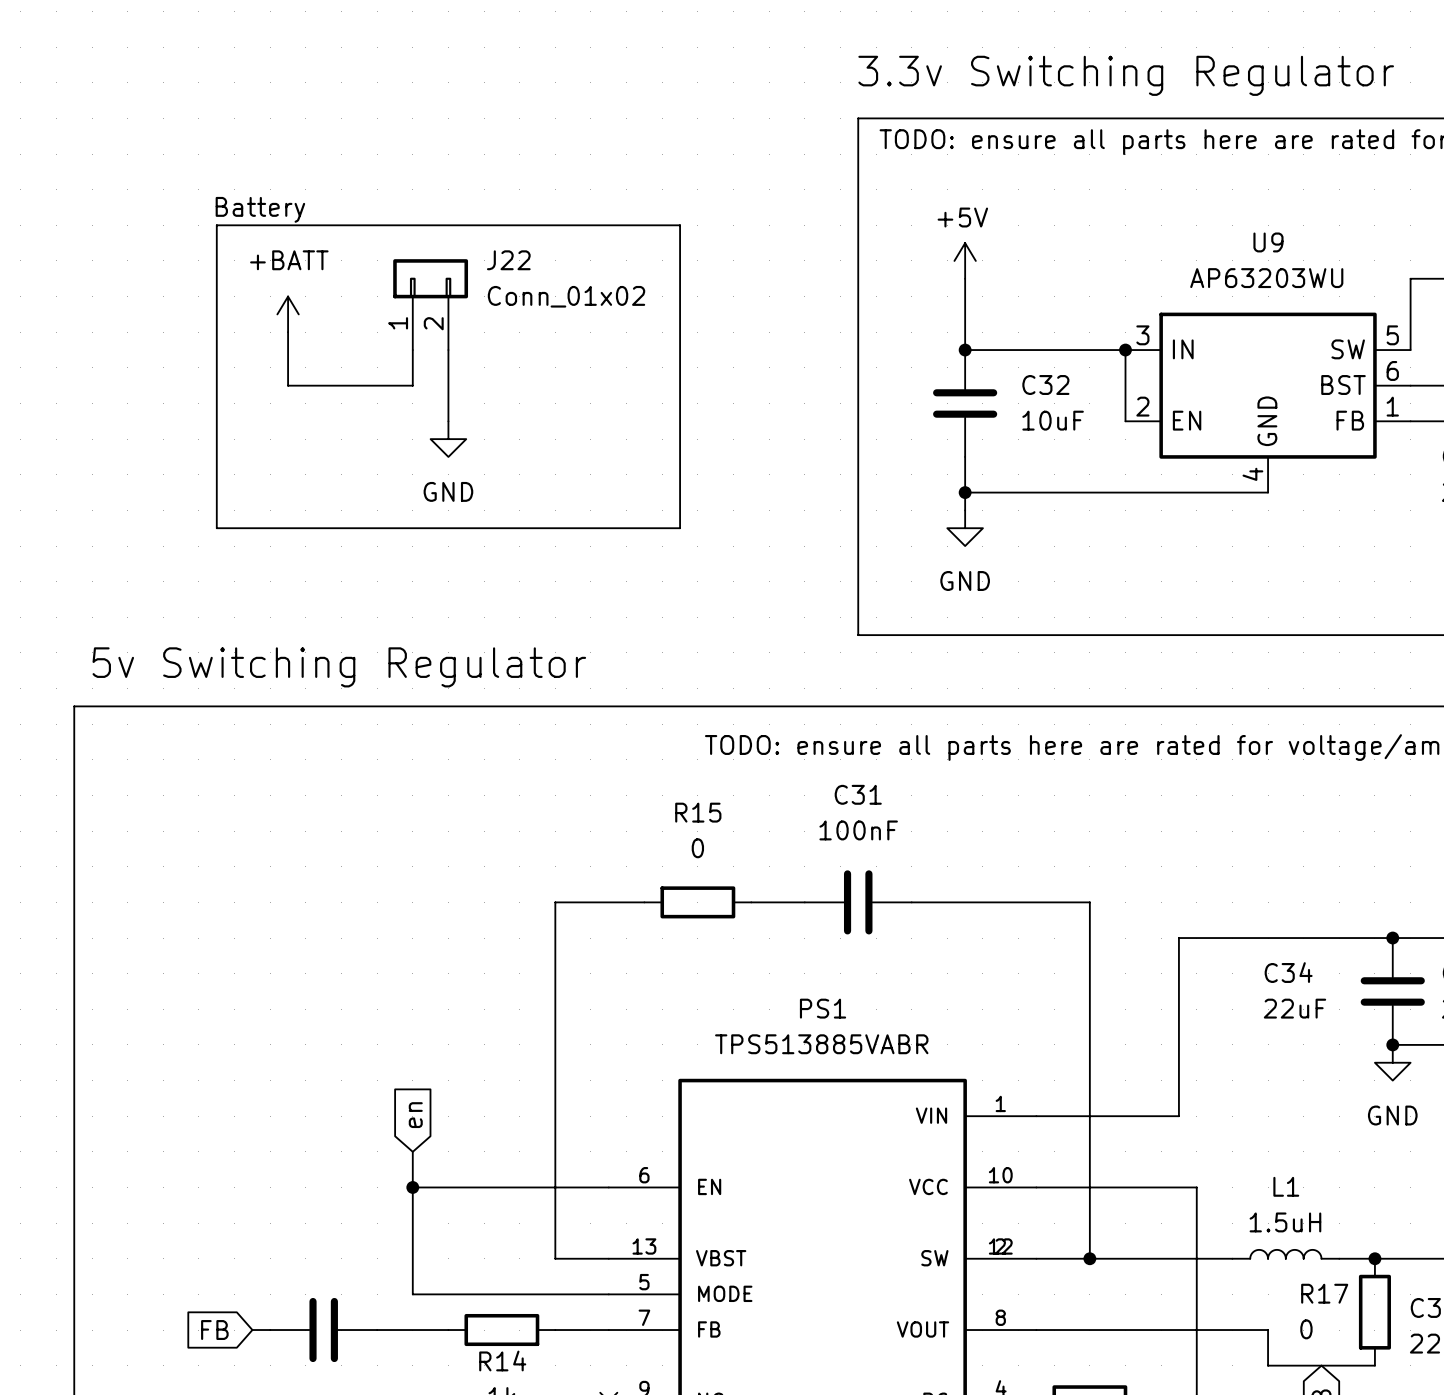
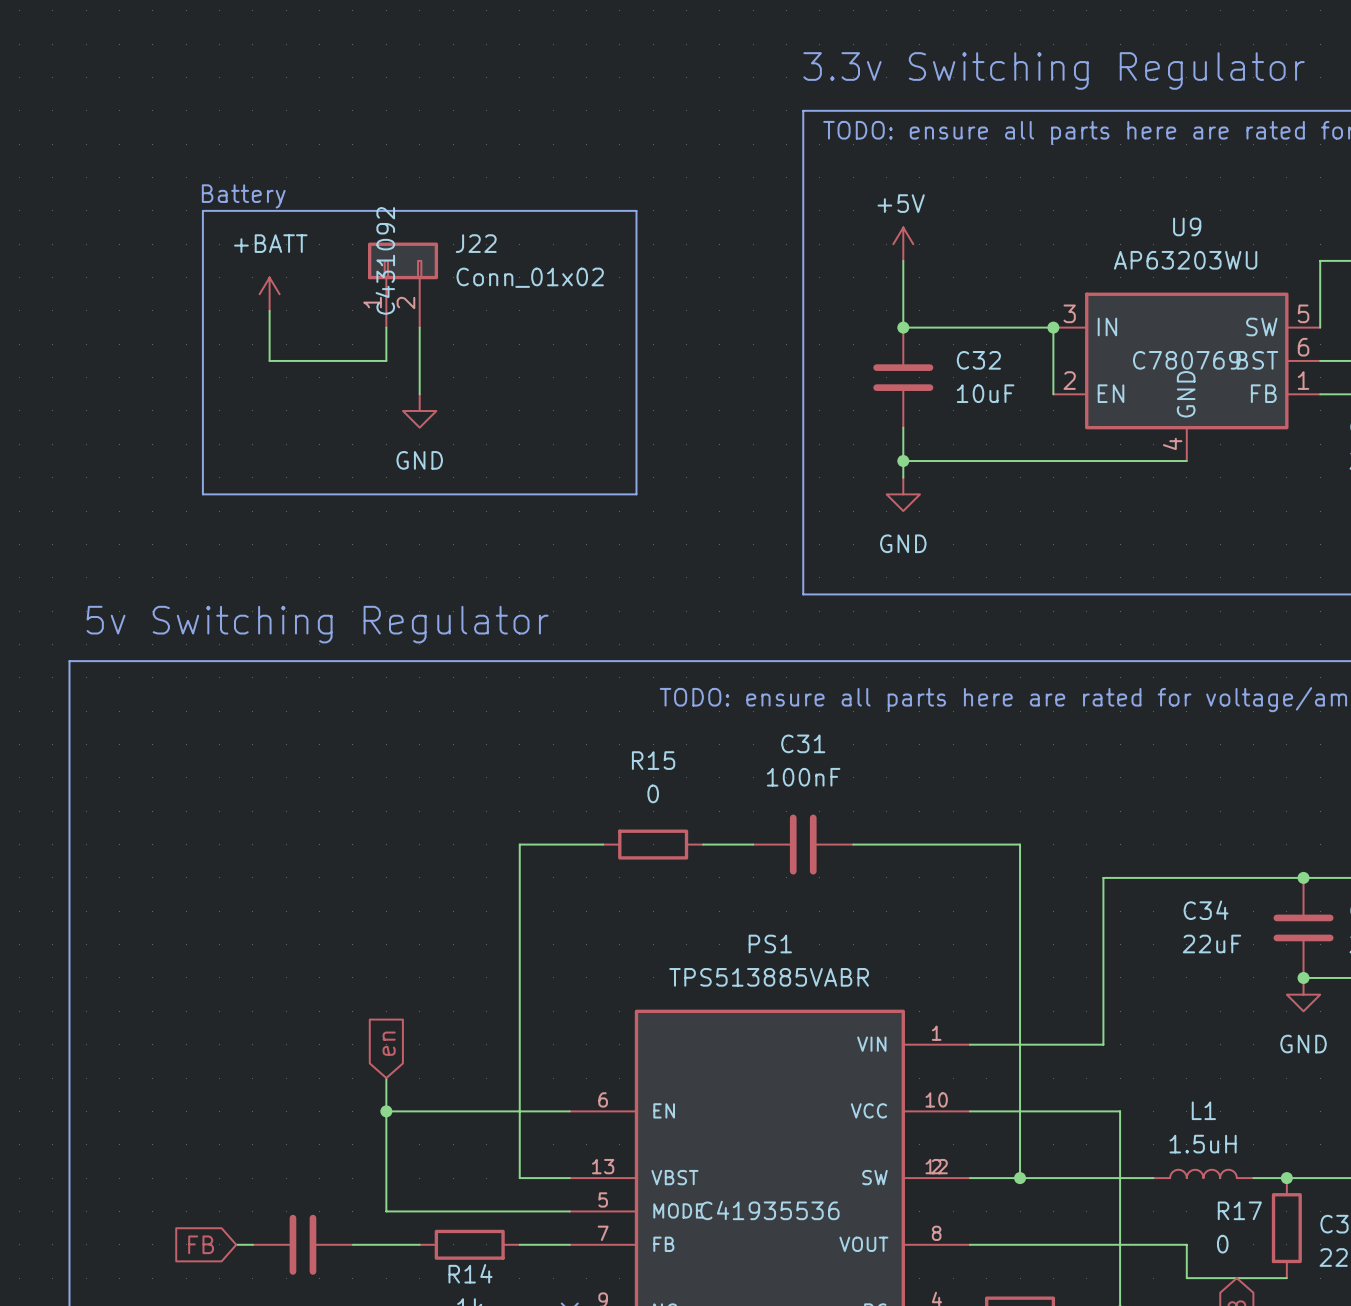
J22 text: none -> C431092 (385, 260)
U9 text: none -> C780769 (1186, 360)
PS1 text: none -> C41935536 (769, 1210)

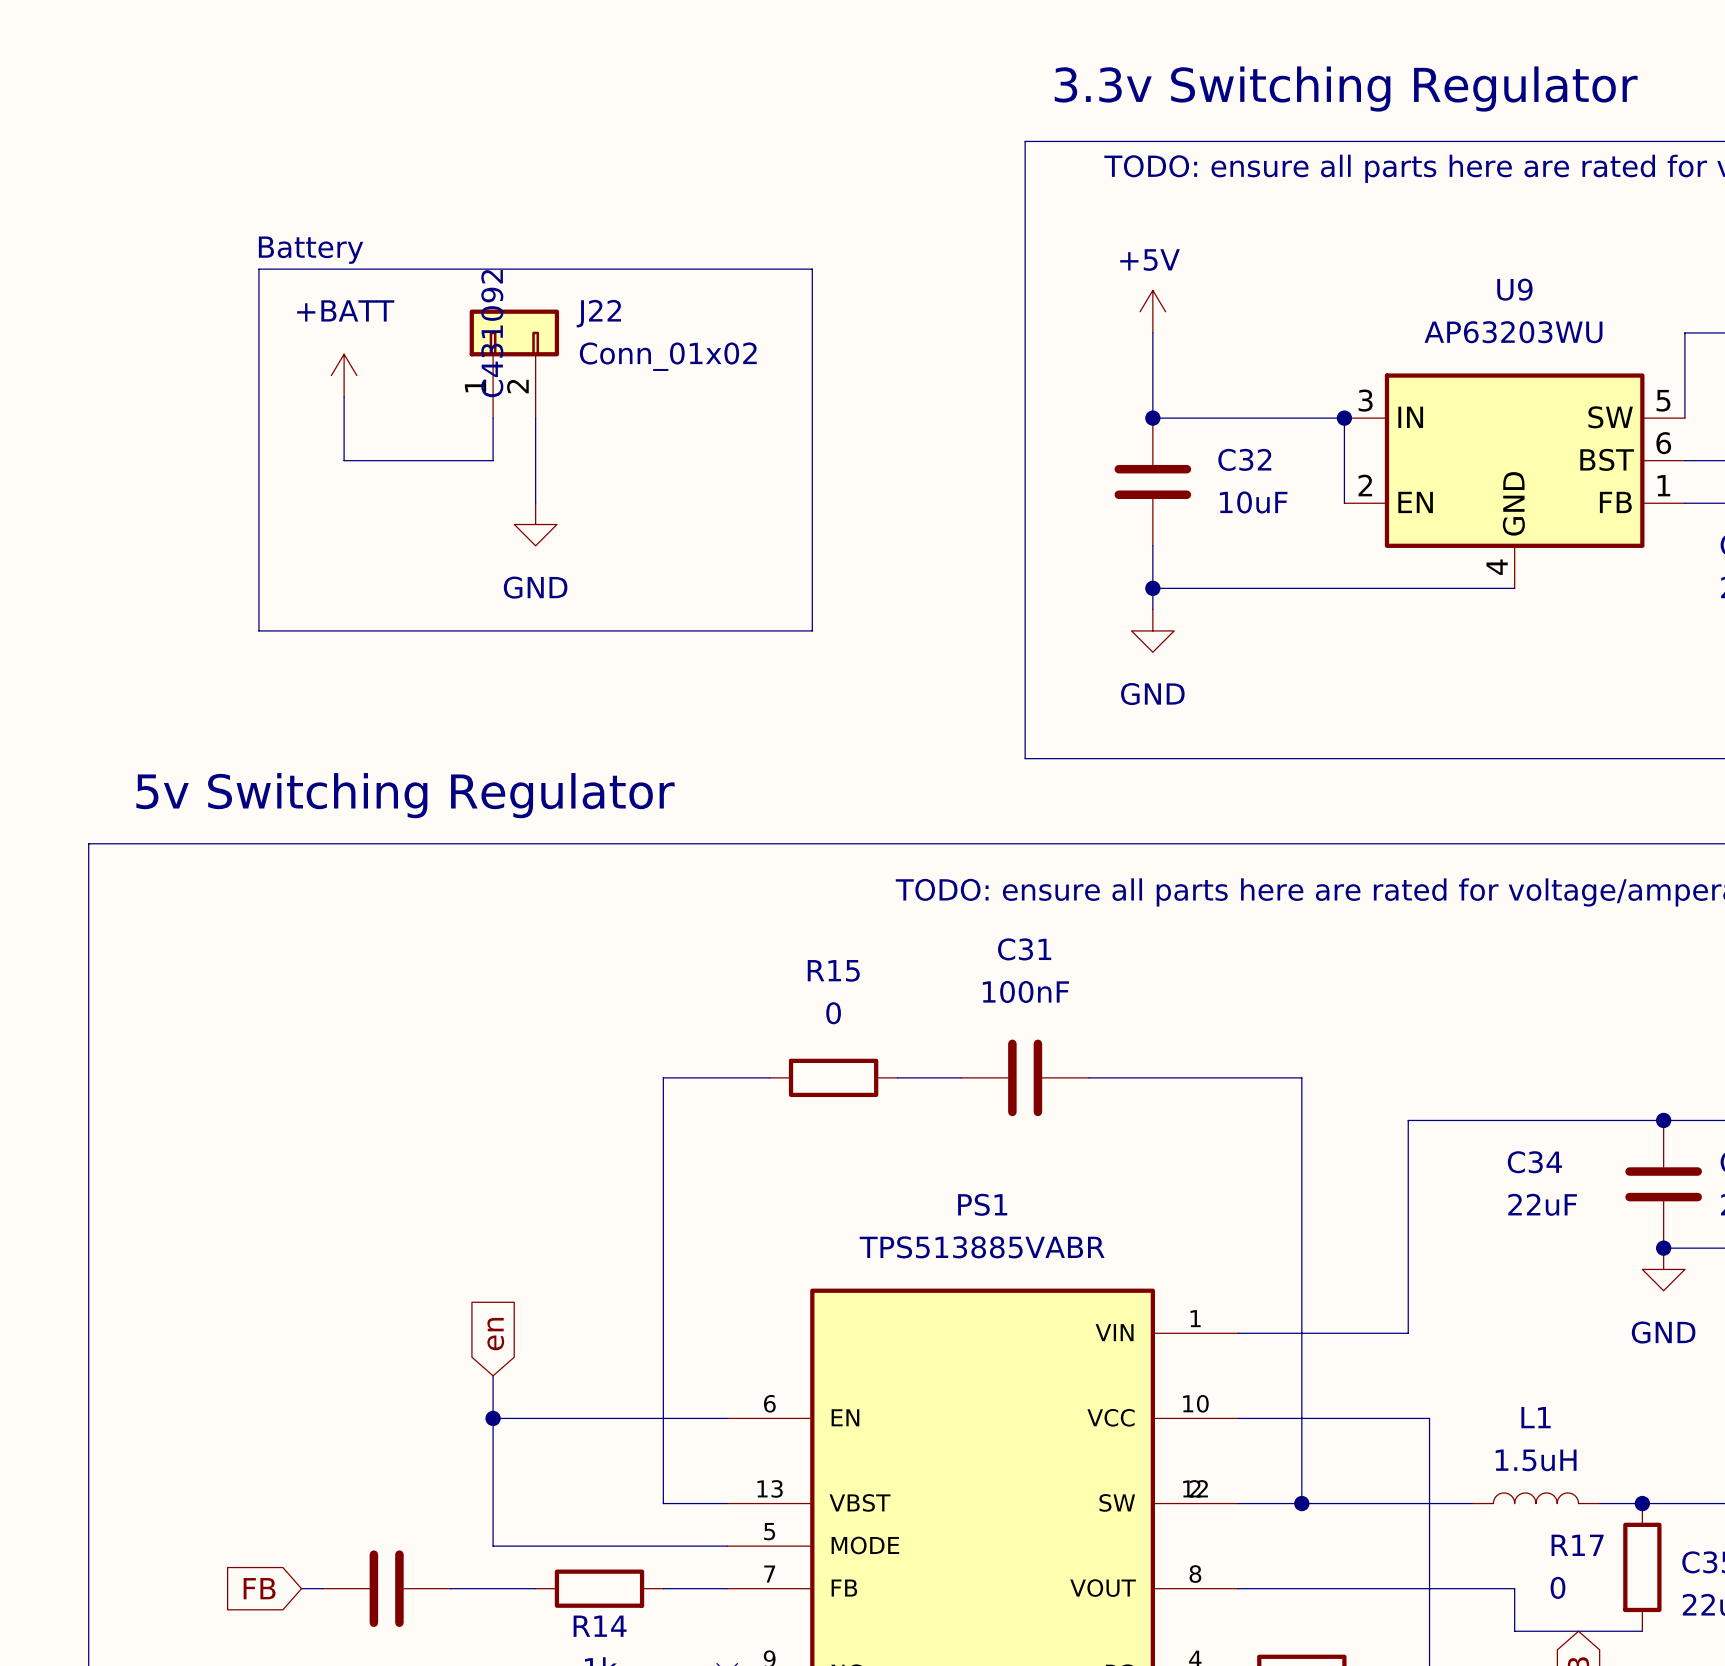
U9 text: C780769 (1186, 360) -> none
PS1 text: C41935536 (769, 1210) -> none

